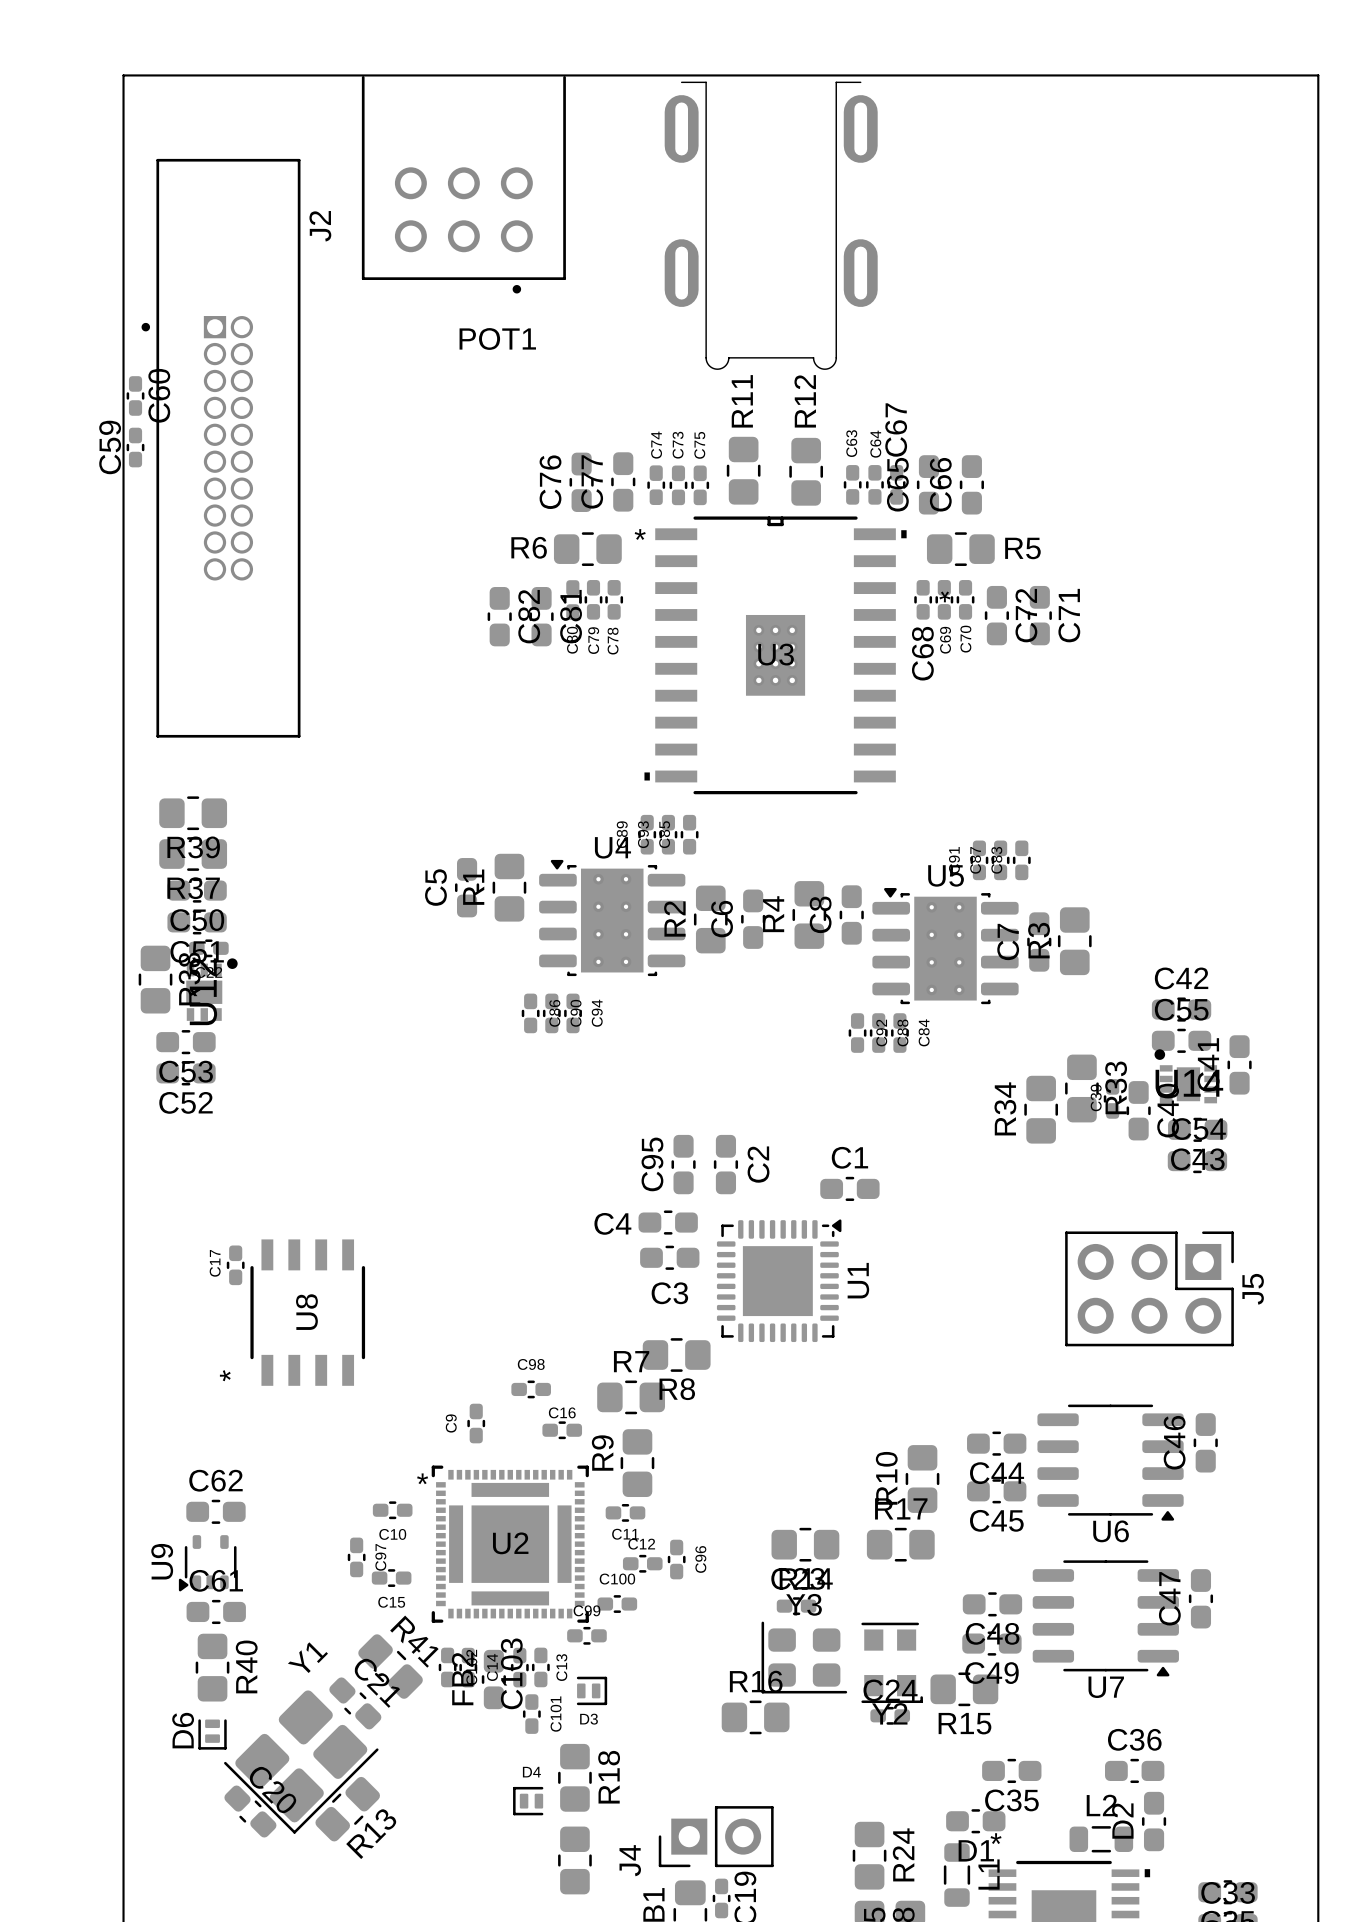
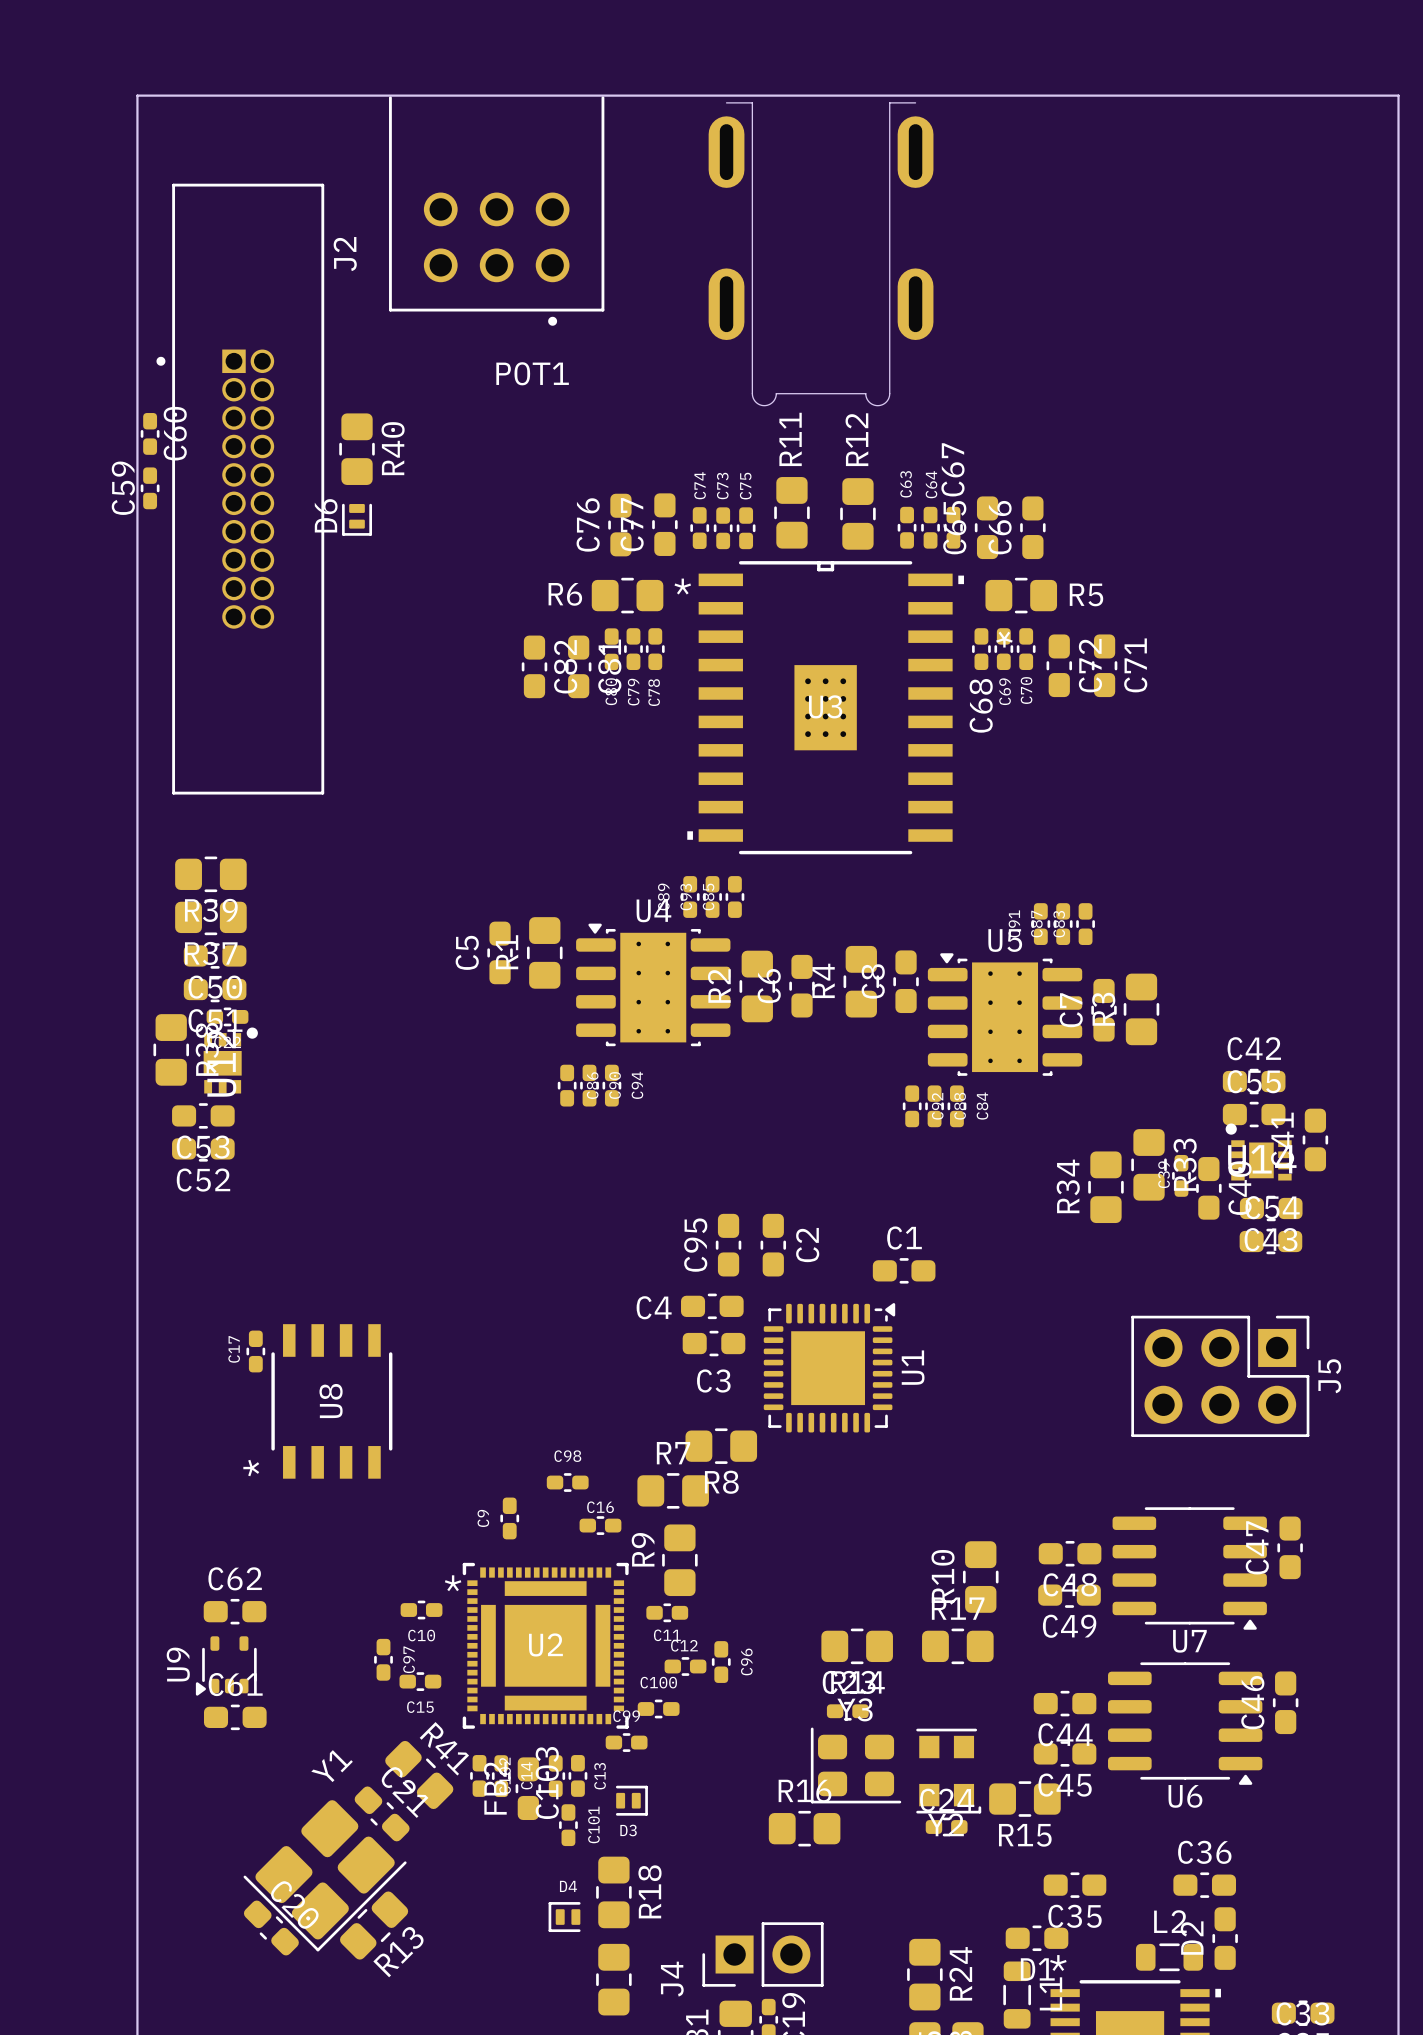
C46 position: (1205, 1442) -> (1285, 1702)
C44 position: (996, 1443) -> (1065, 1703)
U6 position: (1110, 1462) -> (1185, 1723)
C45 position: (996, 1491) -> (1065, 1753)
C47 position: (1200, 1598) -> (1290, 1547)
C48 position: (992, 1604) -> (1070, 1553)
U7 position: (1105, 1618) -> (1189, 1568)
C49 position: (991, 1643) -> (1069, 1595)
R40 position: (212, 1667) -> (357, 449)
D6 position: (212, 1734) -> (357, 519)

